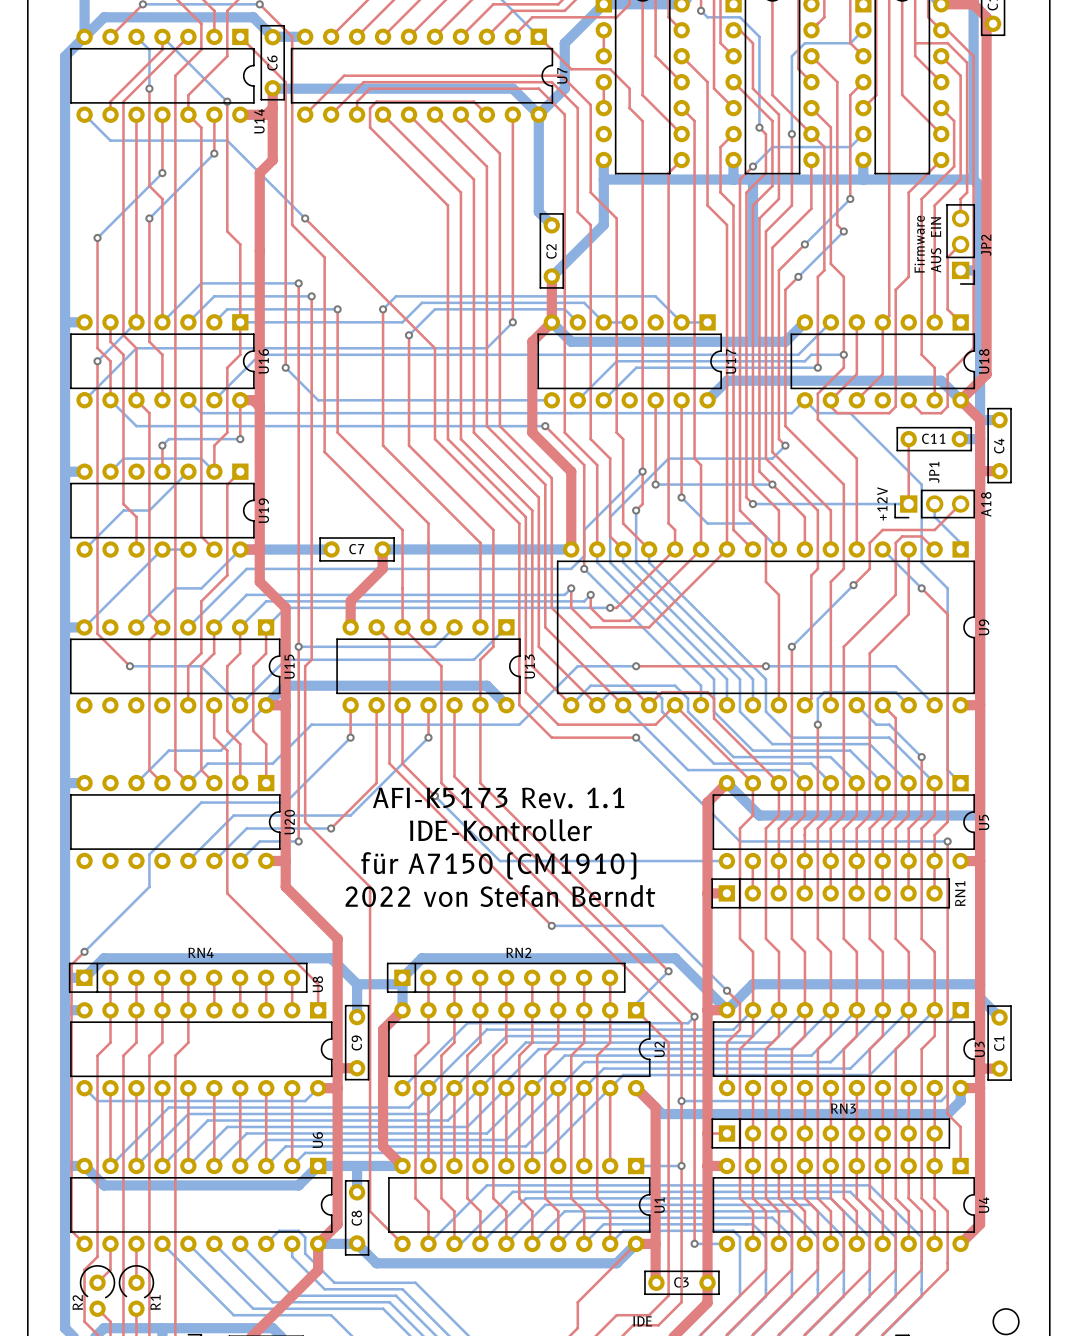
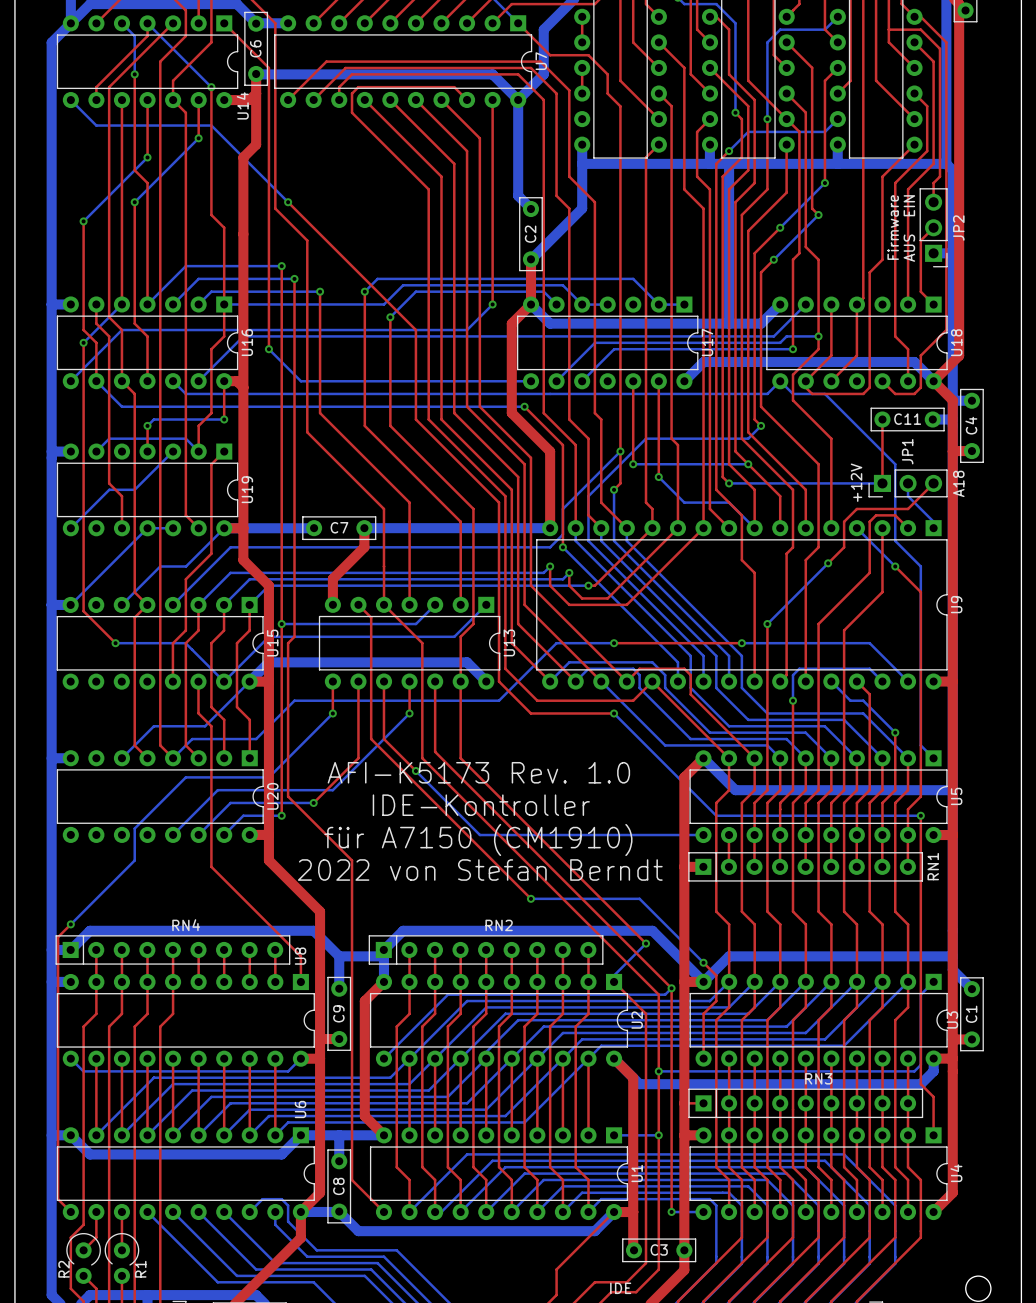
text: AFI-K5173 Rev. 1.1 (498, 797) -> AFI-K5173 Rev. 1.0 (478, 772)

